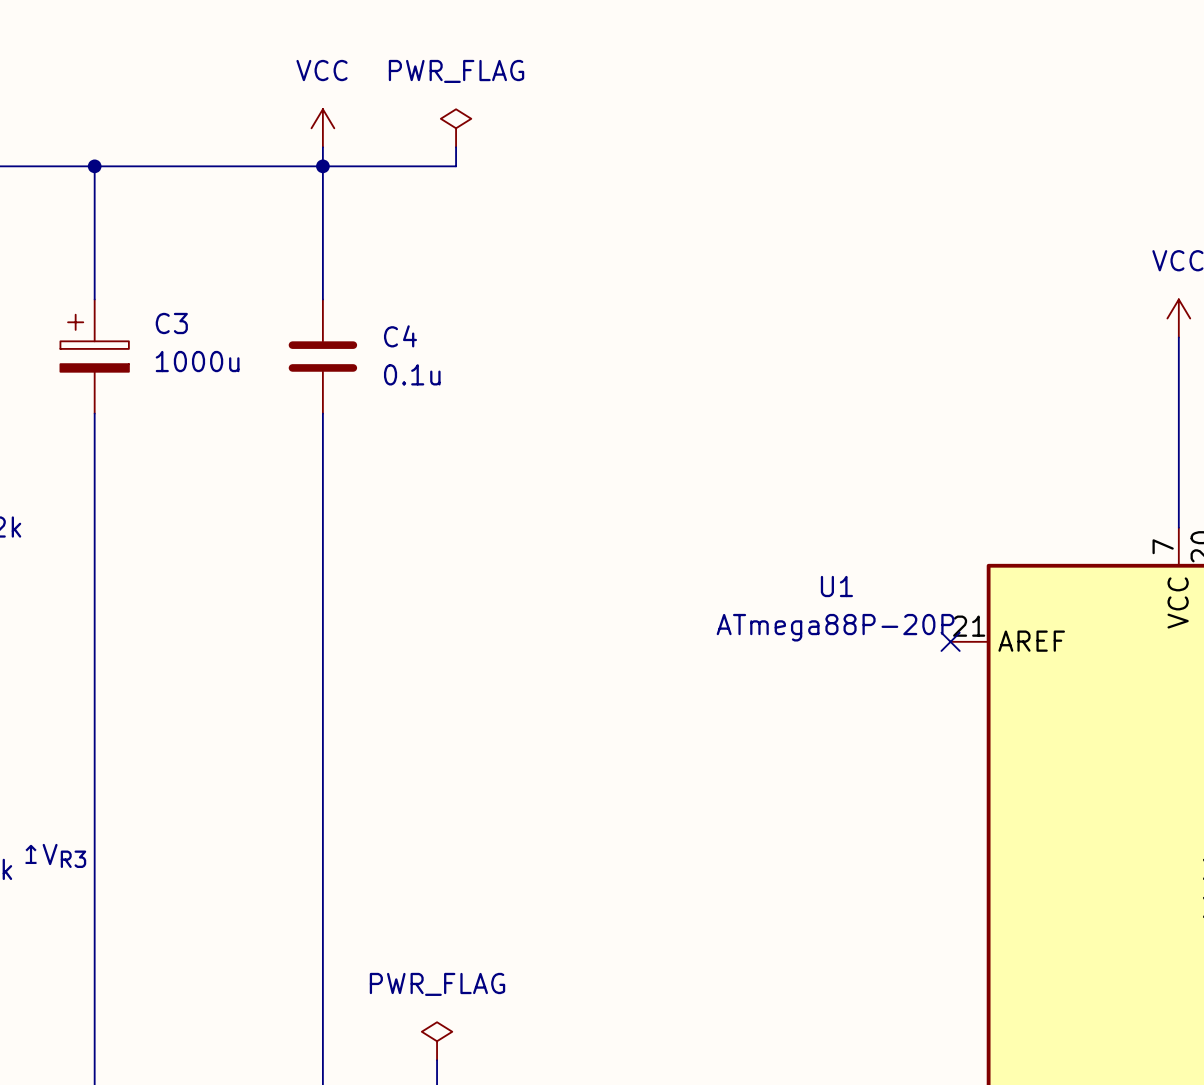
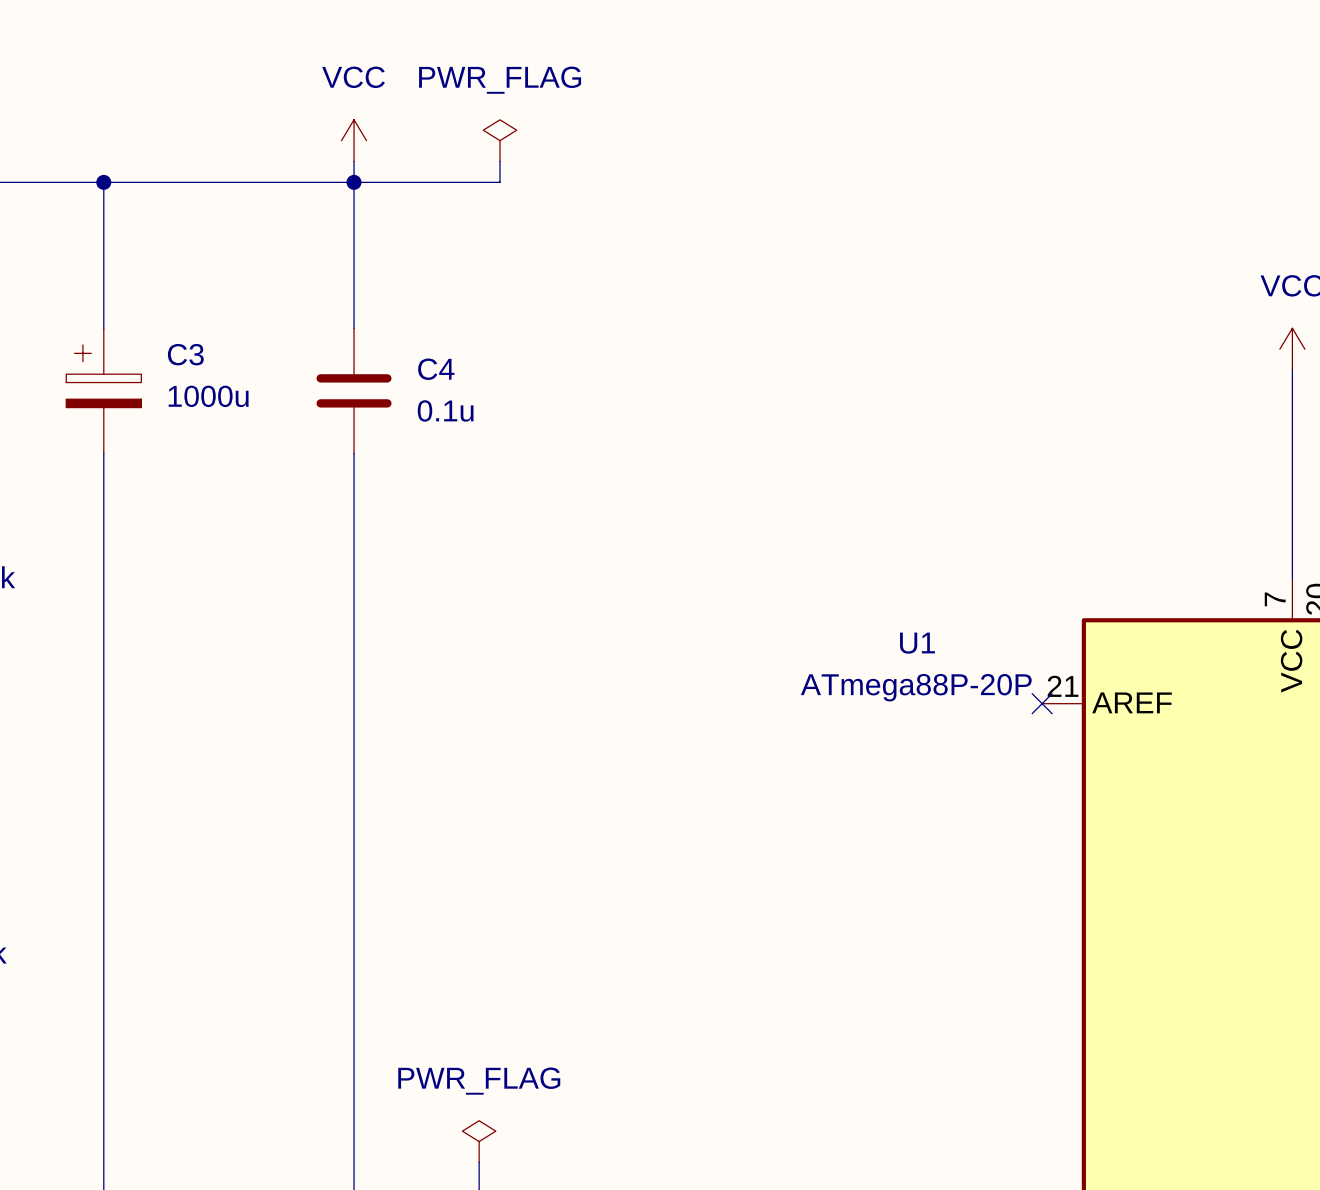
text: ↥VR3 (55, 855) -> none

